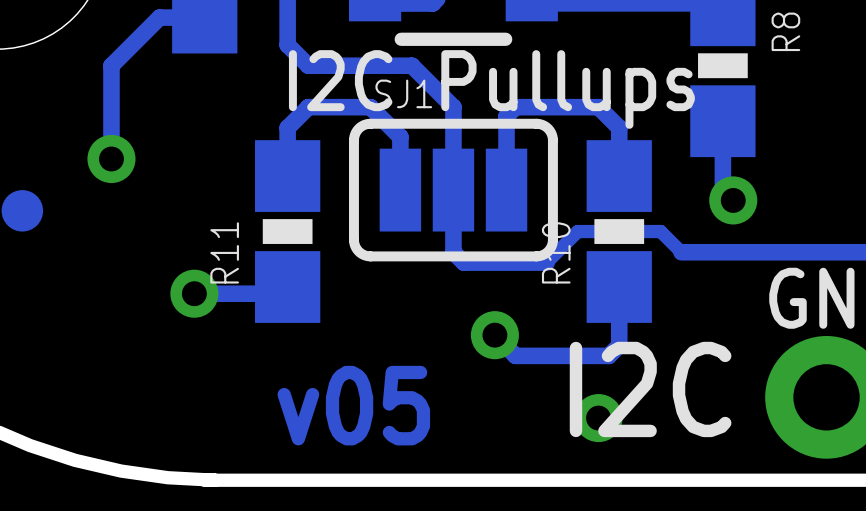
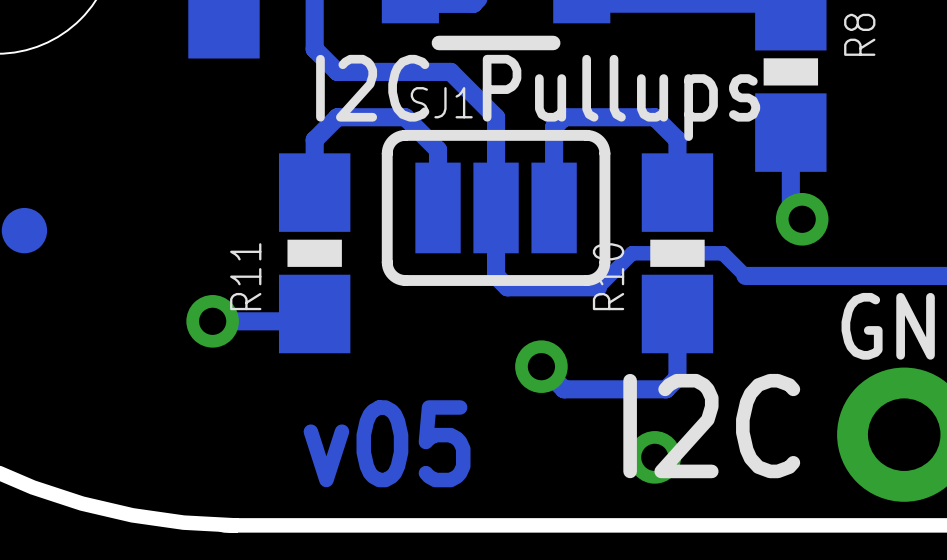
track: (204, 17) (159, 17) (111, 65) (111, 158) -> none
via: (111, 158) -> none

